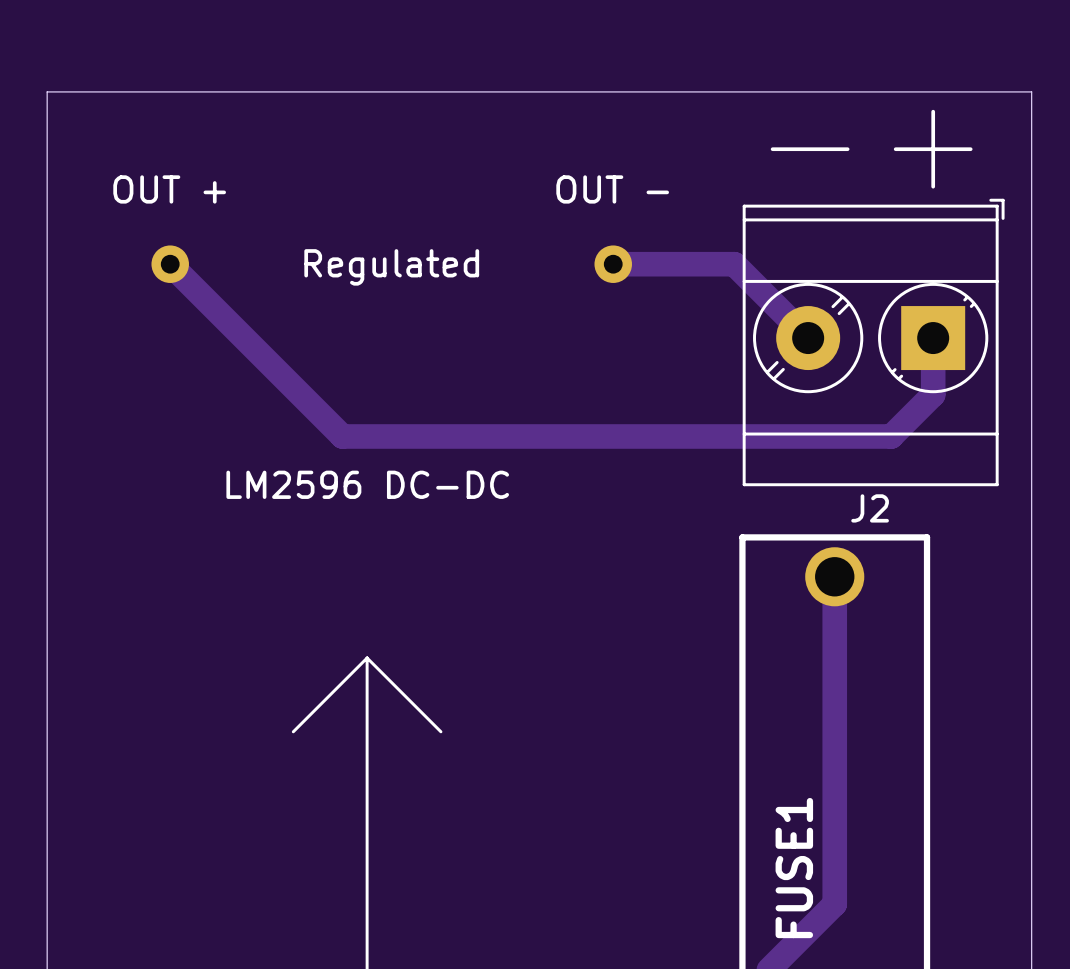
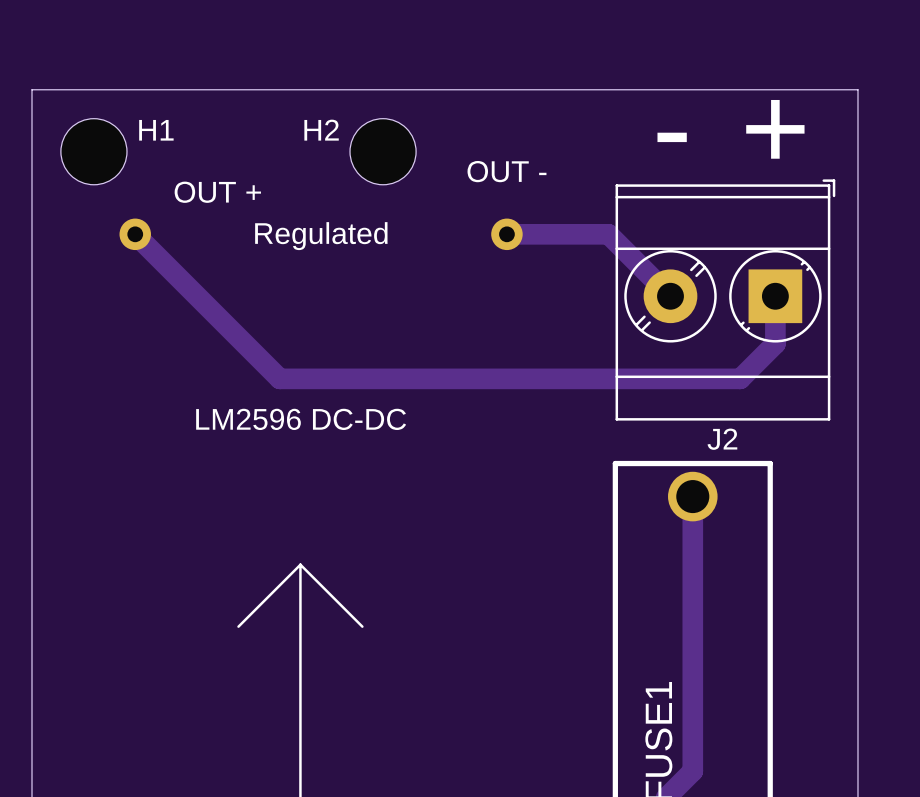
H1: none -> (93, 151)
H2: none -> (383, 151)
part text position: OUT + (169, 189) -> OUT + (217, 192)

